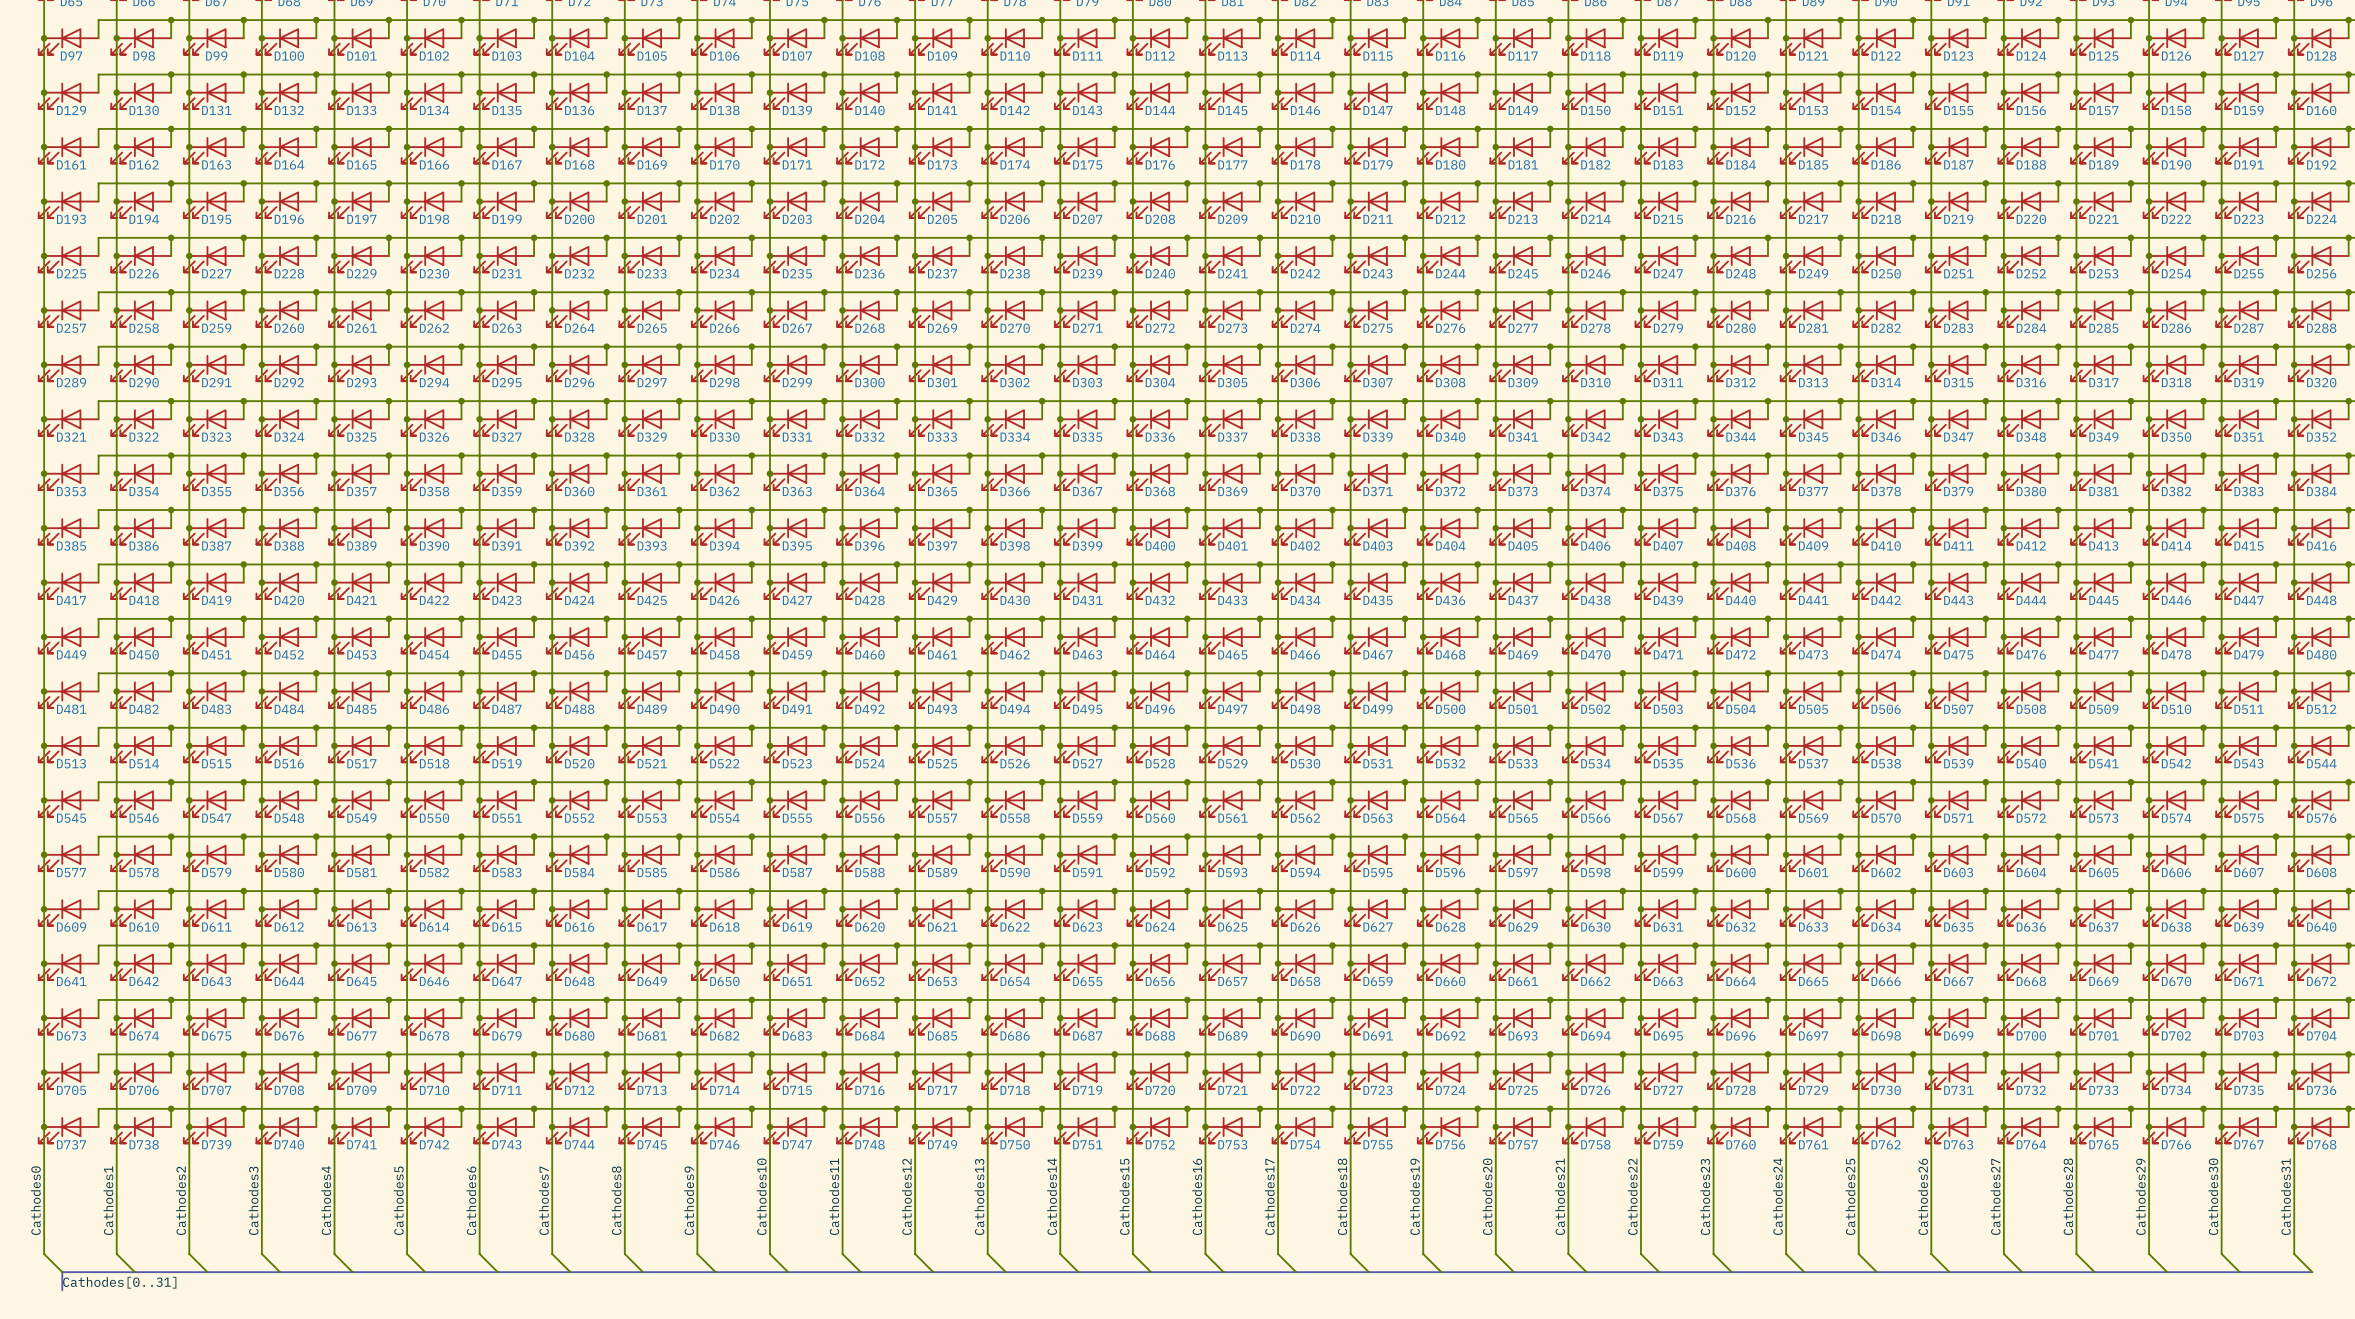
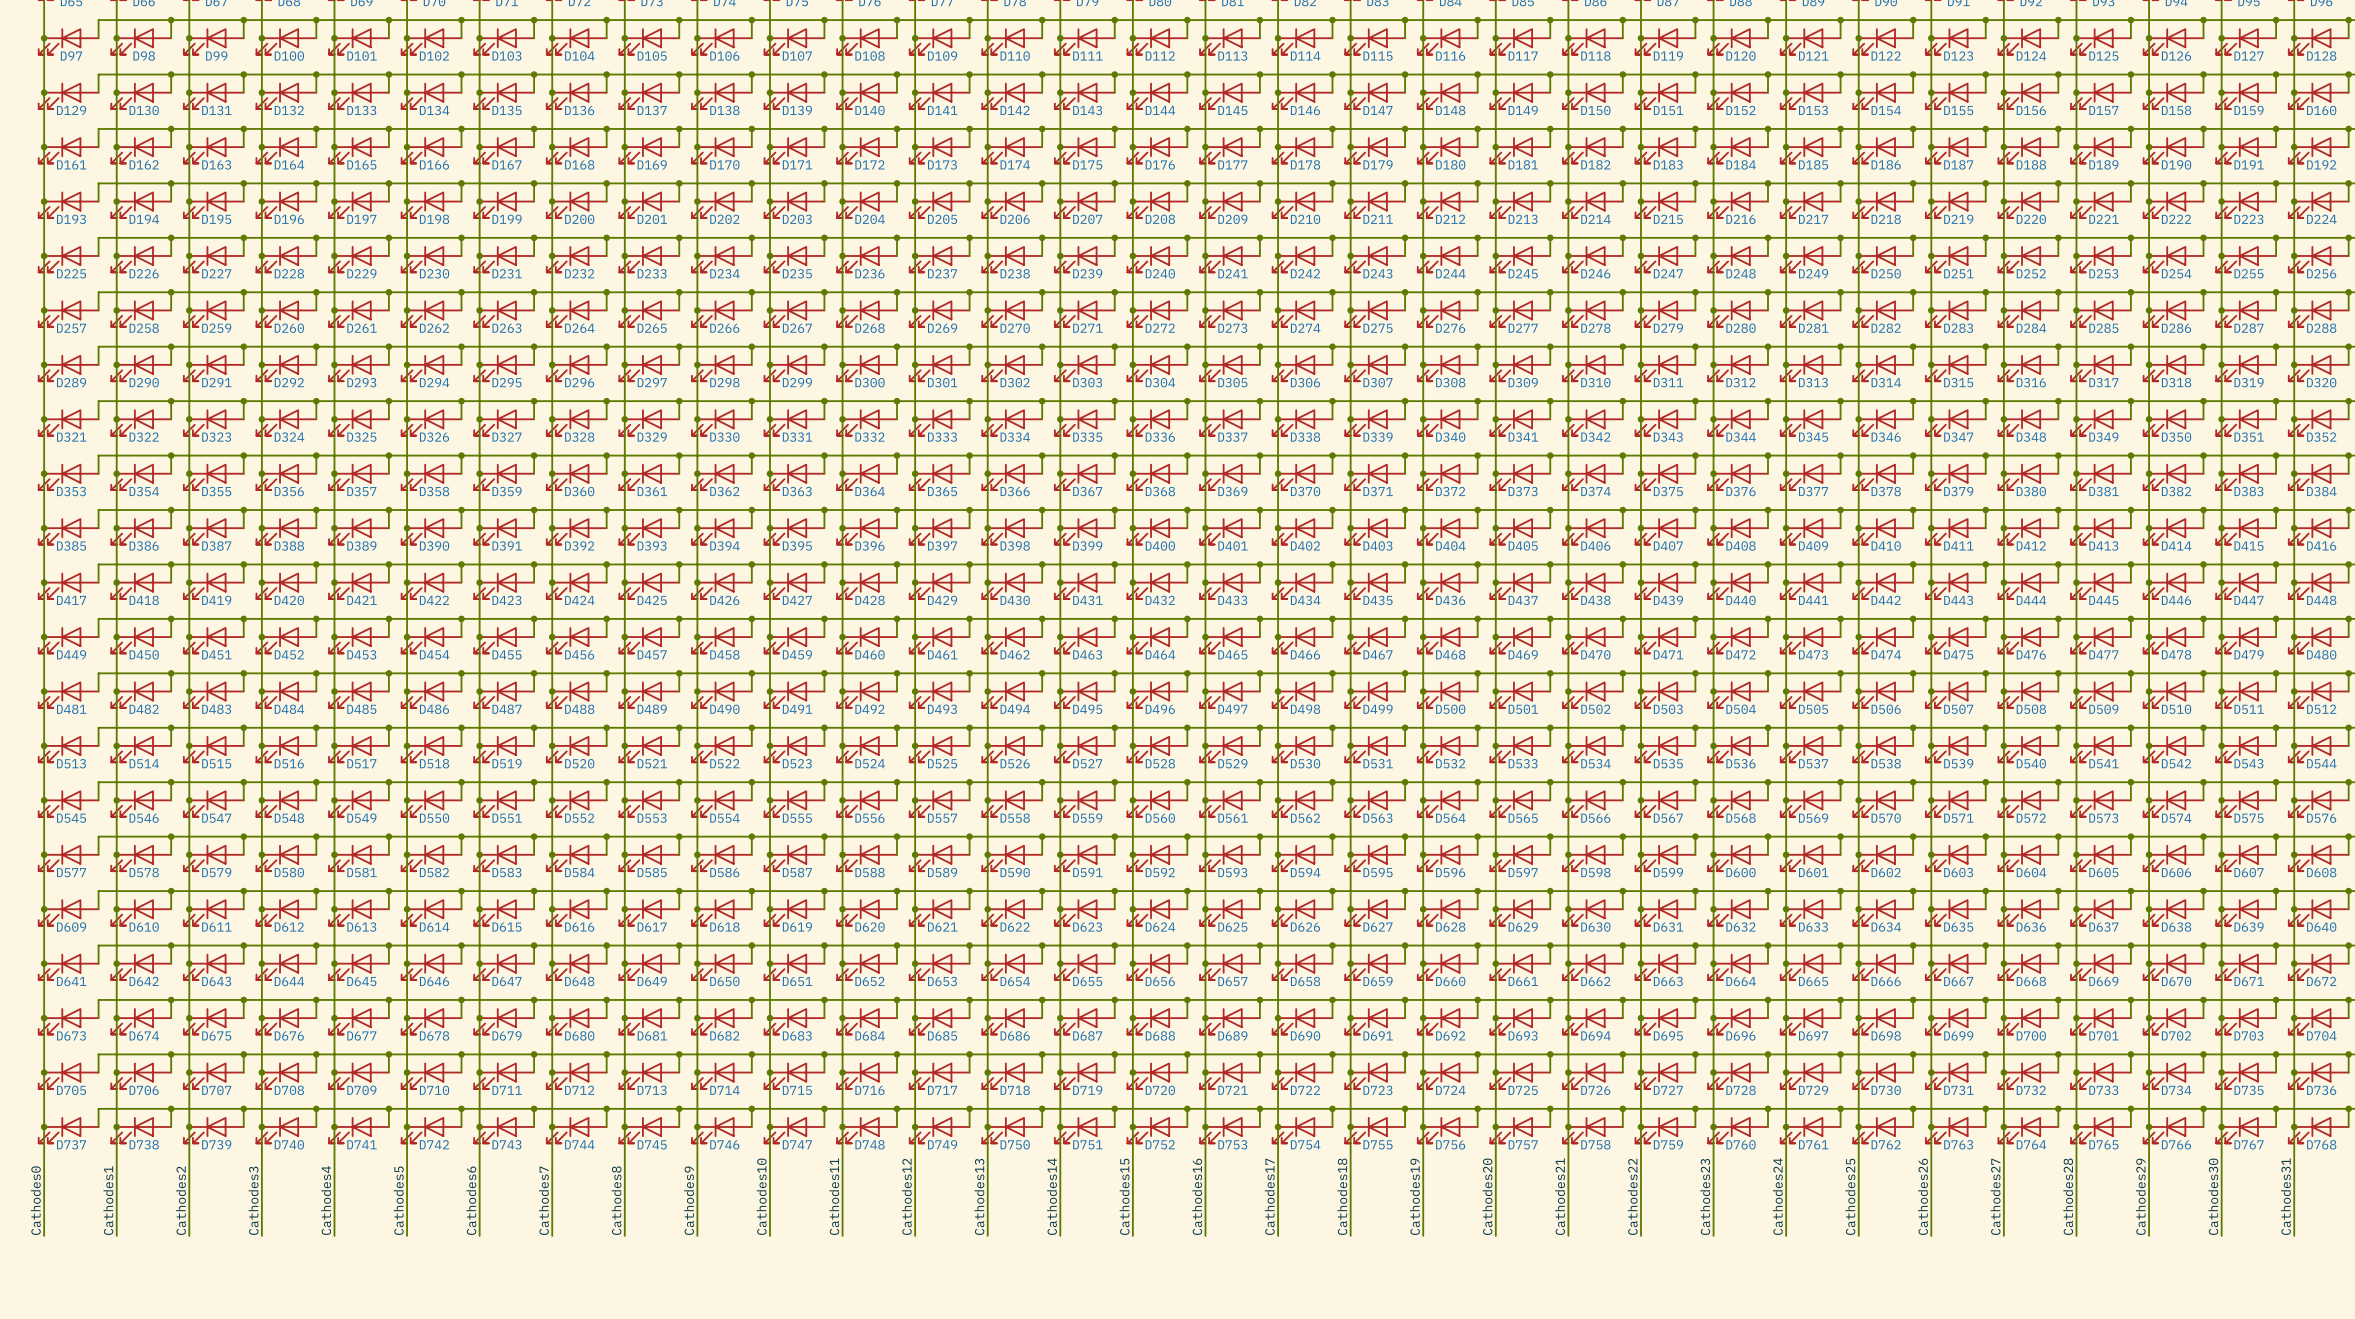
wire: (44, 1235) (44, 1254) (62, 1272) -> none
wire: (116, 1235) (116, 1254) (134, 1272) -> none
wire: (189, 1235) (189, 1254) (207, 1272) -> none
wire: (261, 1235) (261, 1254) (280, 1272) -> none
wire: (334, 1235) (334, 1254) (352, 1272) -> none
wire: (407, 1235) (407, 1254) (425, 1272) -> none
wire: (479, 1235) (479, 1254) (497, 1272) -> none
wire: (552, 1235) (552, 1254) (570, 1272) -> none
wire: (624, 1235) (624, 1254) (642, 1272) -> none
wire: (697, 1235) (697, 1254) (715, 1272) -> none
wire: (769, 1235) (769, 1254) (788, 1272) -> none
wire: (842, 1235) (842, 1254) (860, 1272) -> none
wire: (915, 1235) (915, 1254) (933, 1272) -> none
wire: (987, 1235) (987, 1254) (1005, 1272) -> none
wire: (1060, 1235) (1060, 1254) (1078, 1272) -> none
wire: (1132, 1235) (1132, 1254) (1151, 1272) -> none
wire: (1205, 1235) (1205, 1254) (1223, 1272) -> none
wire: (1278, 1235) (1278, 1254) (1296, 1272) -> none
wire: (1350, 1235) (1350, 1254) (1368, 1272) -> none
wire: (1423, 1235) (1423, 1254) (1441, 1272) -> none
wire: (1495, 1235) (1495, 1254) (1513, 1272) -> none
wire: (1568, 1235) (1568, 1254) (1586, 1272) -> none
wire: (1640, 1235) (1640, 1254) (1659, 1272) -> none
wire: (1713, 1235) (1713, 1254) (1731, 1272) -> none
wire: (1786, 1235) (1786, 1254) (1804, 1272) -> none
wire: (1858, 1235) (1858, 1254) (1876, 1272) -> none
wire: (1931, 1235) (1931, 1254) (1949, 1272) -> none
wire: (2003, 1235) (2003, 1254) (2022, 1272) -> none
wire: (2076, 1235) (2076, 1254) (2094, 1272) -> none
wire: (2149, 1235) (2149, 1254) (2167, 1272) -> none
wire: (2221, 1235) (2221, 1254) (2239, 1272) -> none
wire: (2294, 1235) (2294, 1254) (2312, 1272) -> none
bus: (2312, 1272) (62, 1272) (62, 1290) -> none
label: Cathodes[0..31] (119, 1282) -> none

